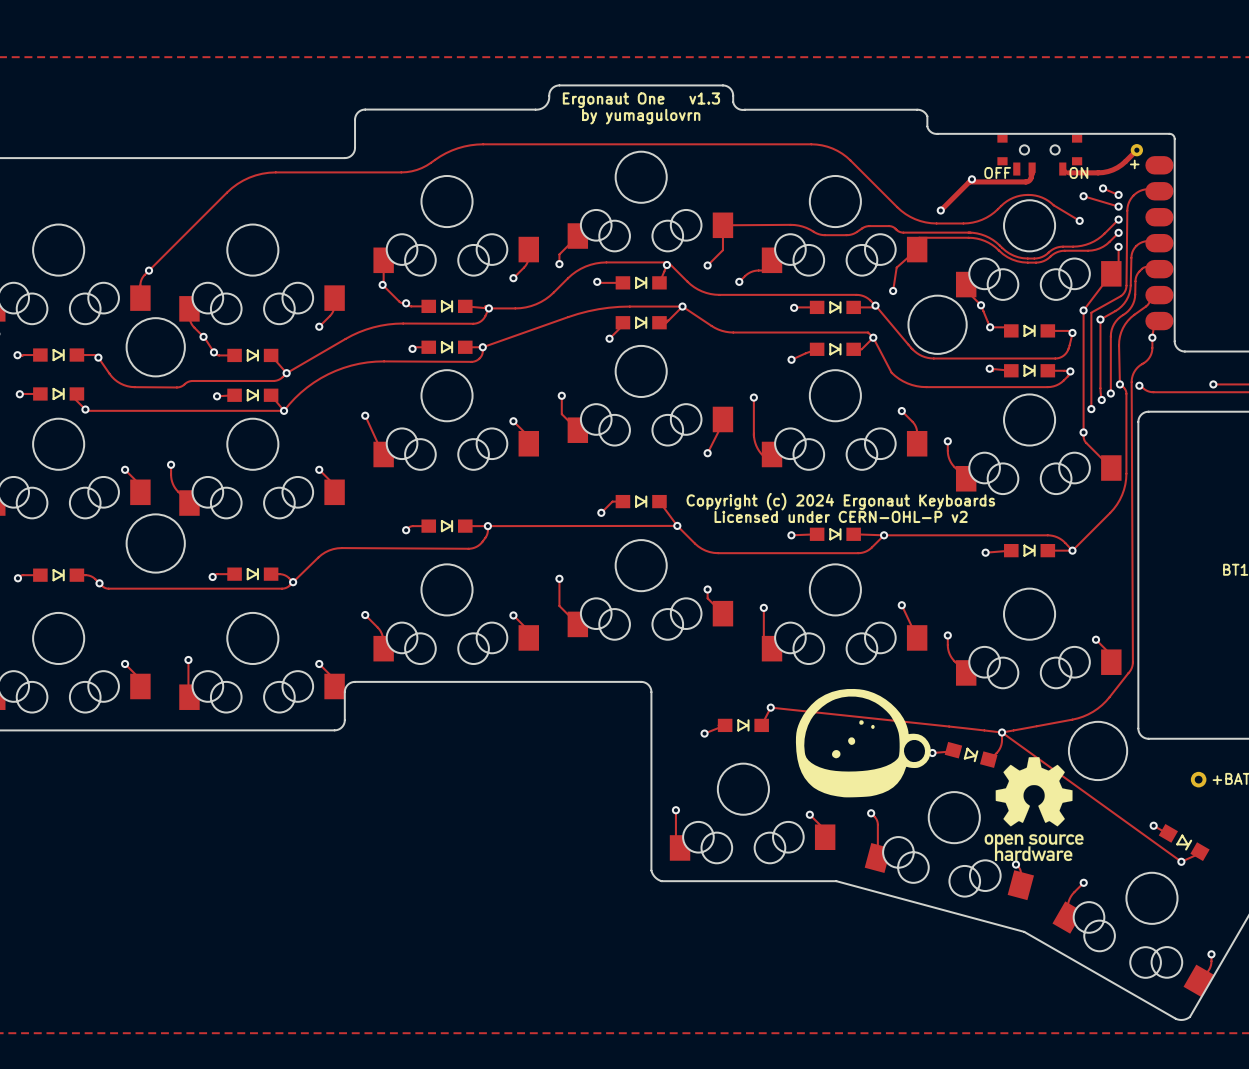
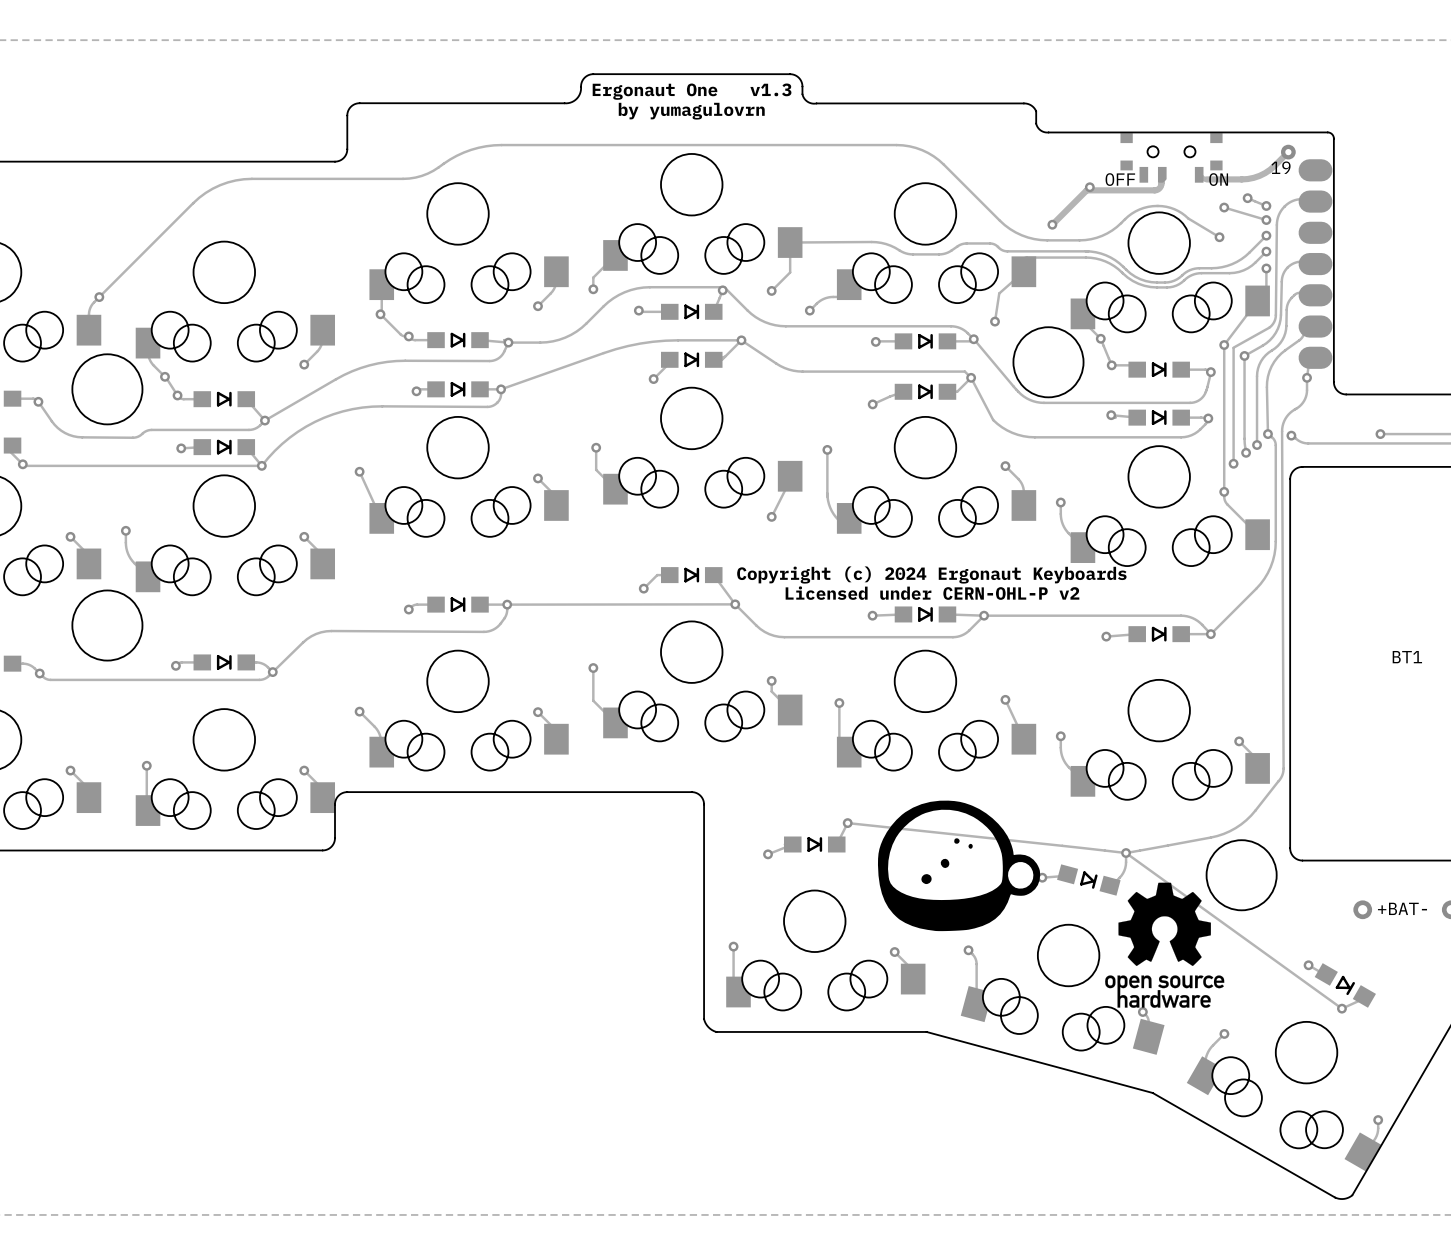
part text: none -> 19 (1281, 167)
part text: + (1134, 164) -> none

